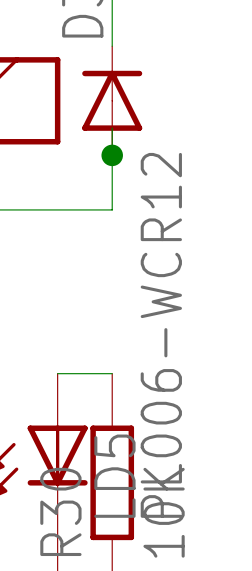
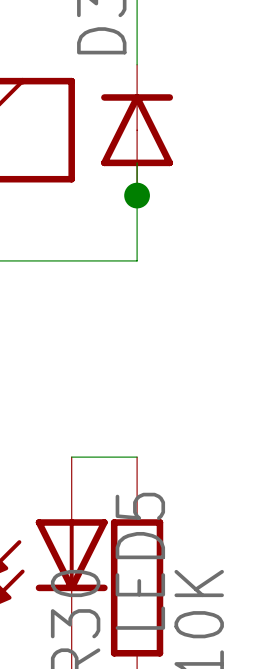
LD5 value: PL006-WCR12 (161, 335) -> none
LD5 name: LD5 (114, 476) -> LED5 (140, 561)

